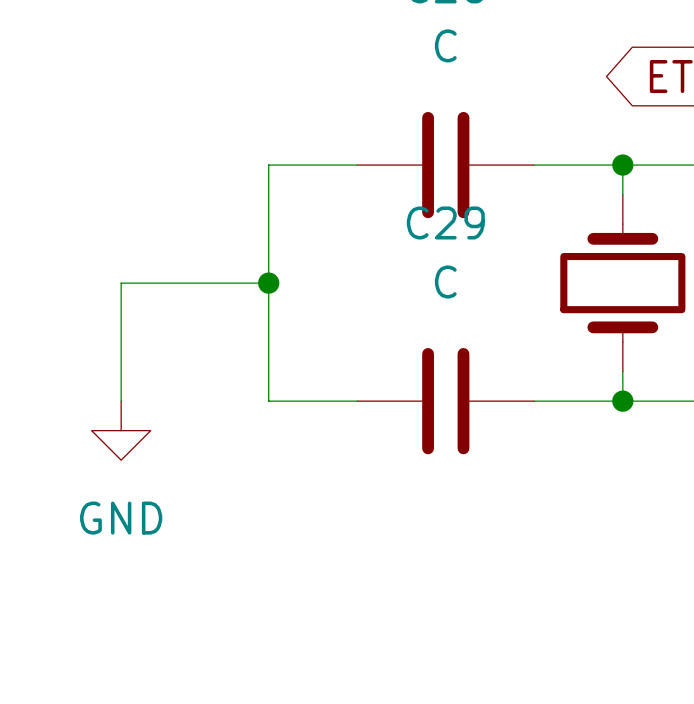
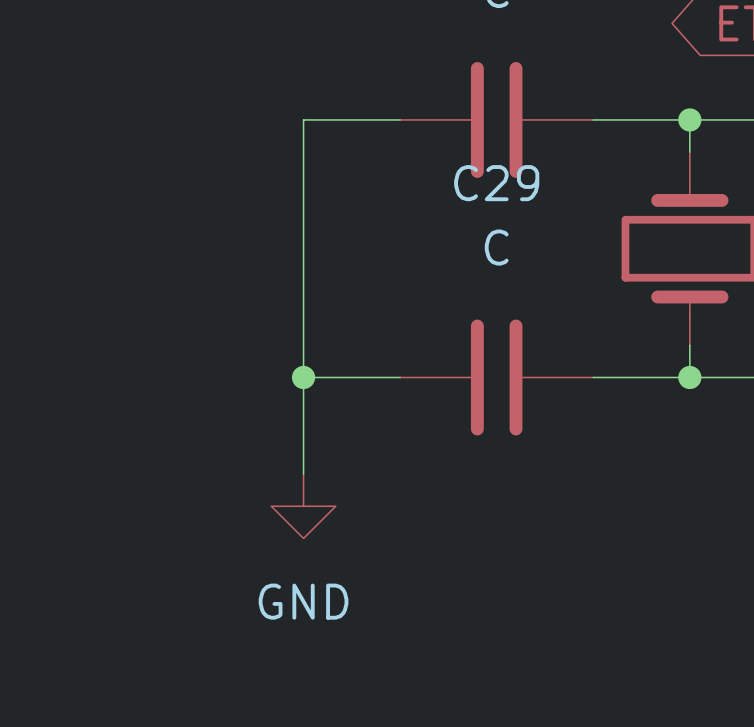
wire: (268, 283) (121, 283) (121, 401) -> none
junction position: (268, 283) -> (303, 377)
wire: none -> (303, 377) (303, 474)
power symbol position: GND (121, 430) -> GND (303, 506)

